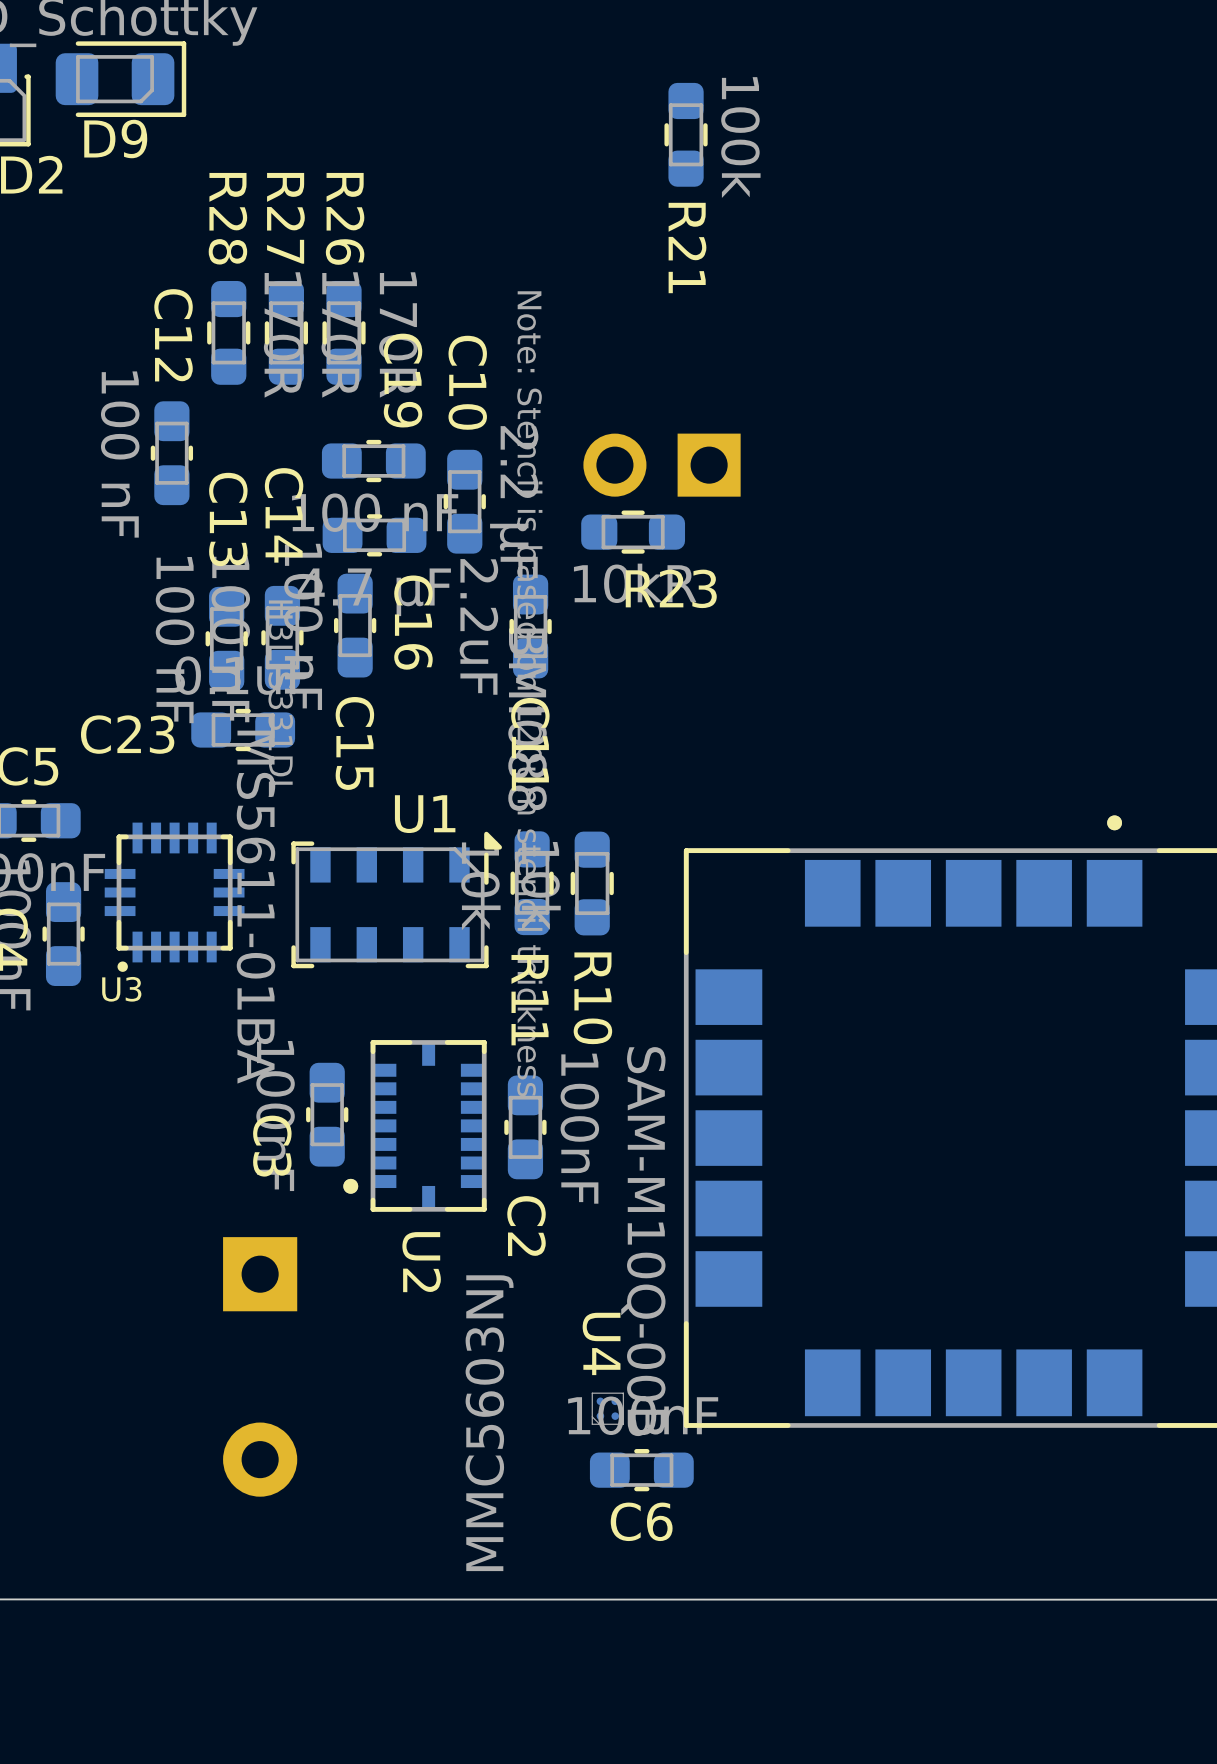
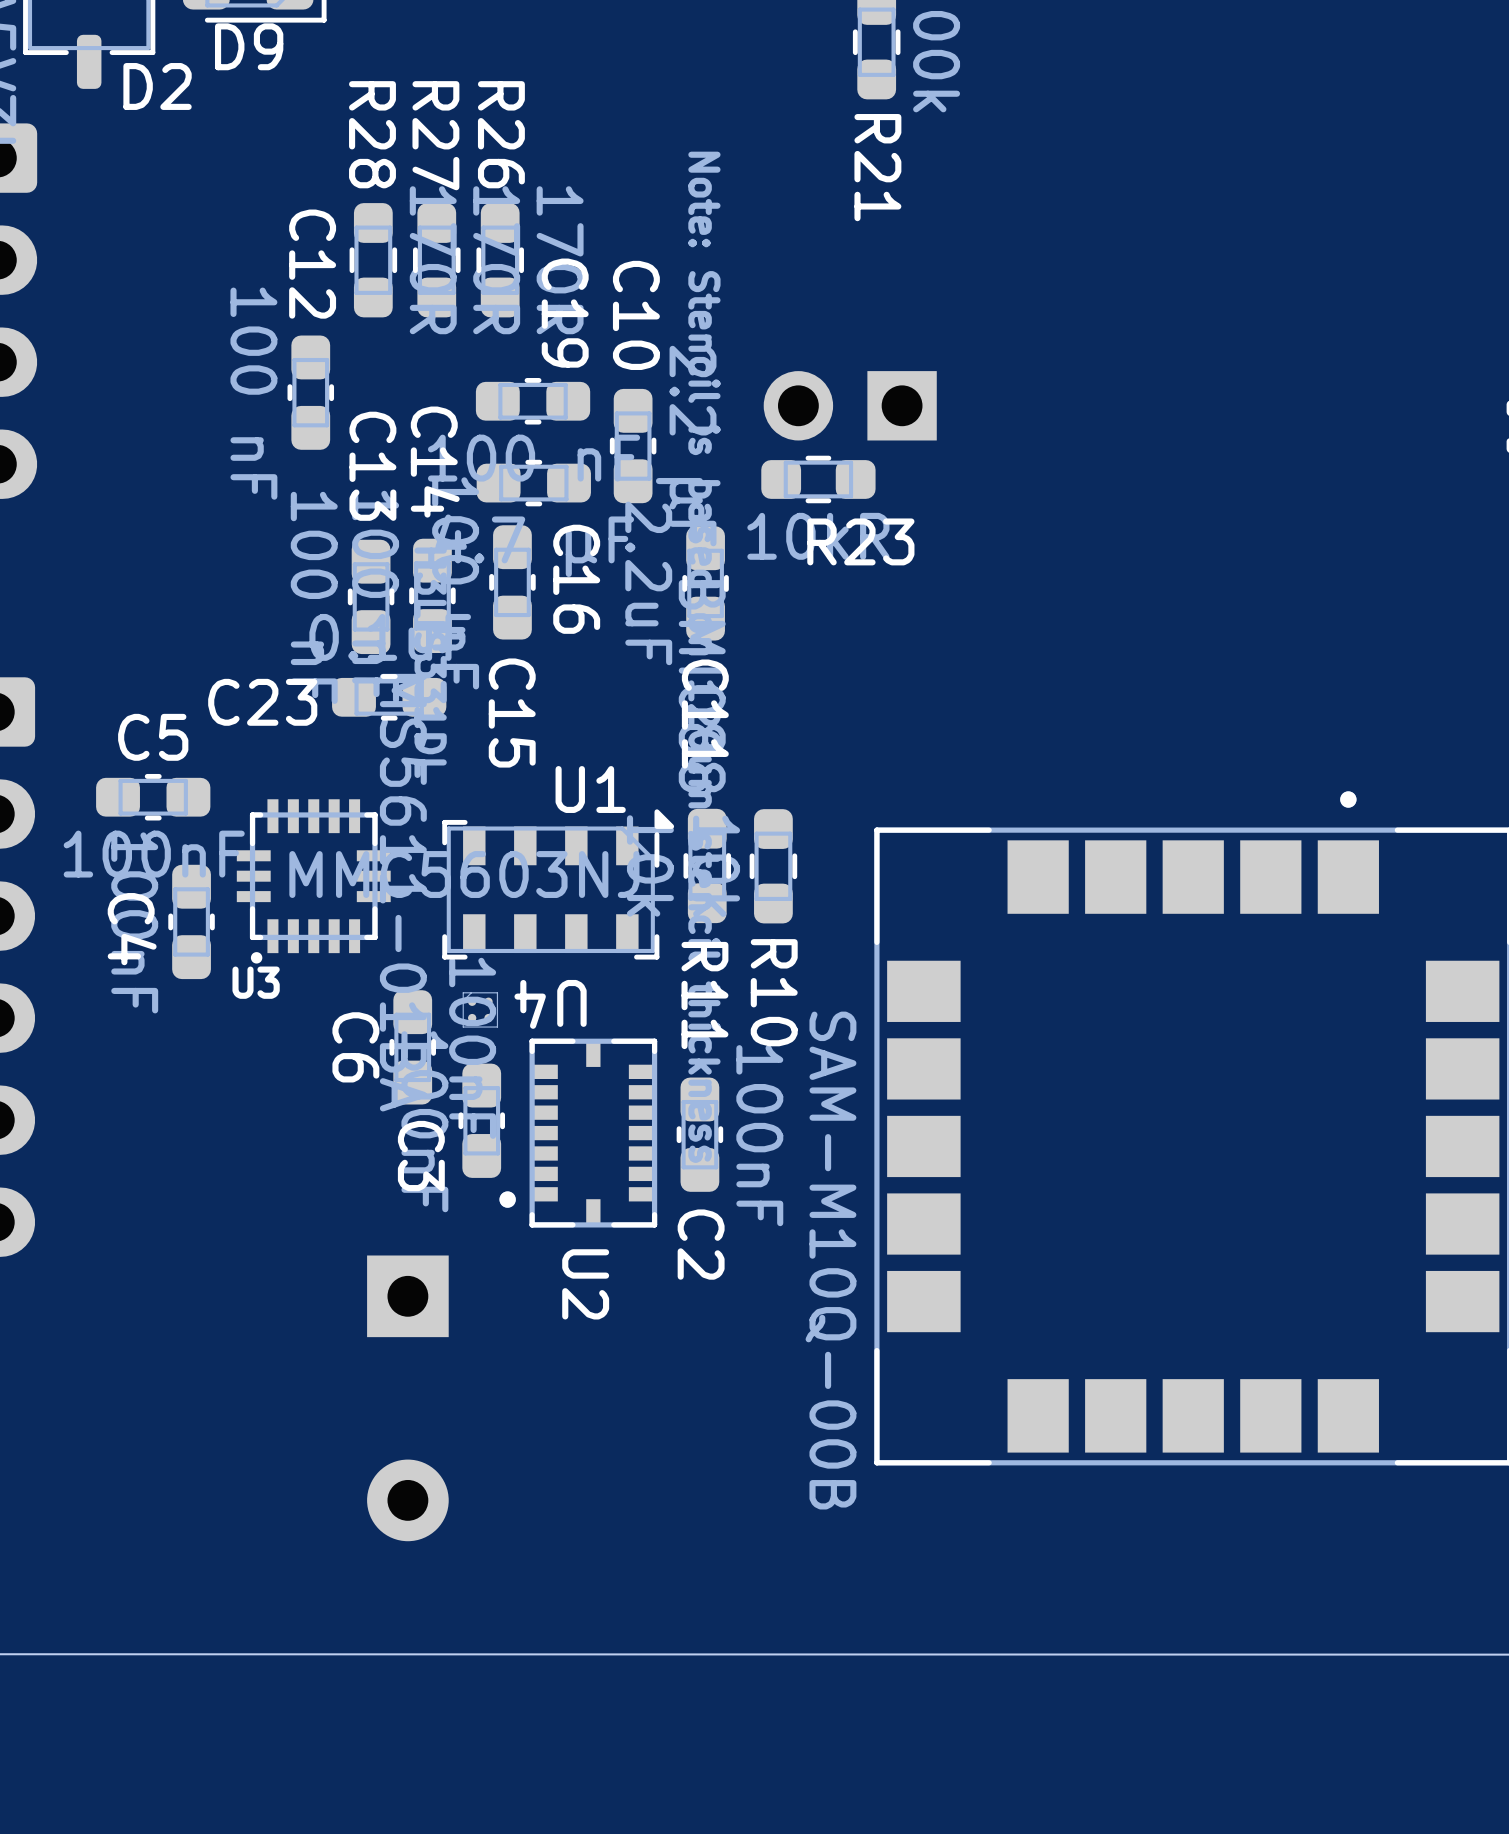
U4 rotation: 0° (607, 1408) -> 90° clockwise (480, 1009)
U4 position: (607, 1408) -> (480, 1009)
C6 rotation: 0° (641, 1470) -> 90° clockwise (412, 1047)
C6 position: (641, 1470) -> (412, 1047)

